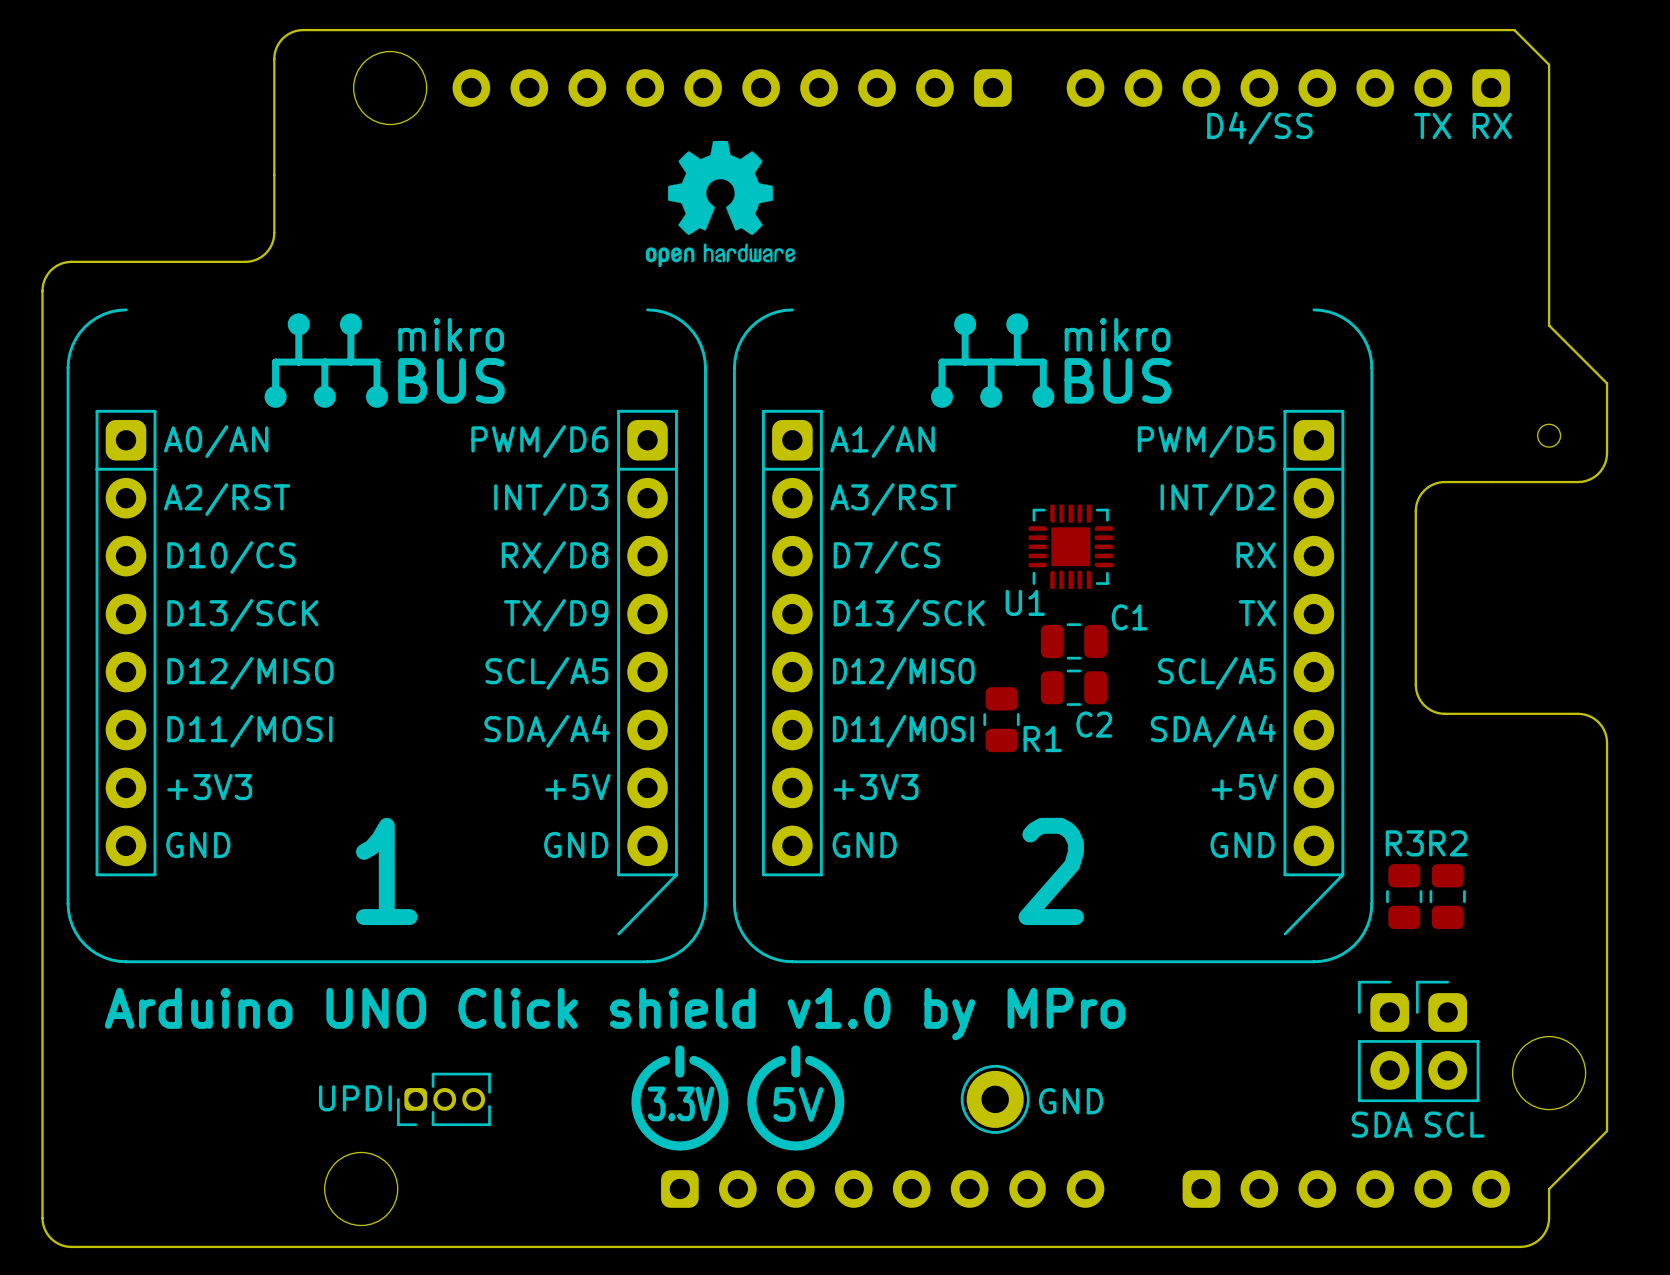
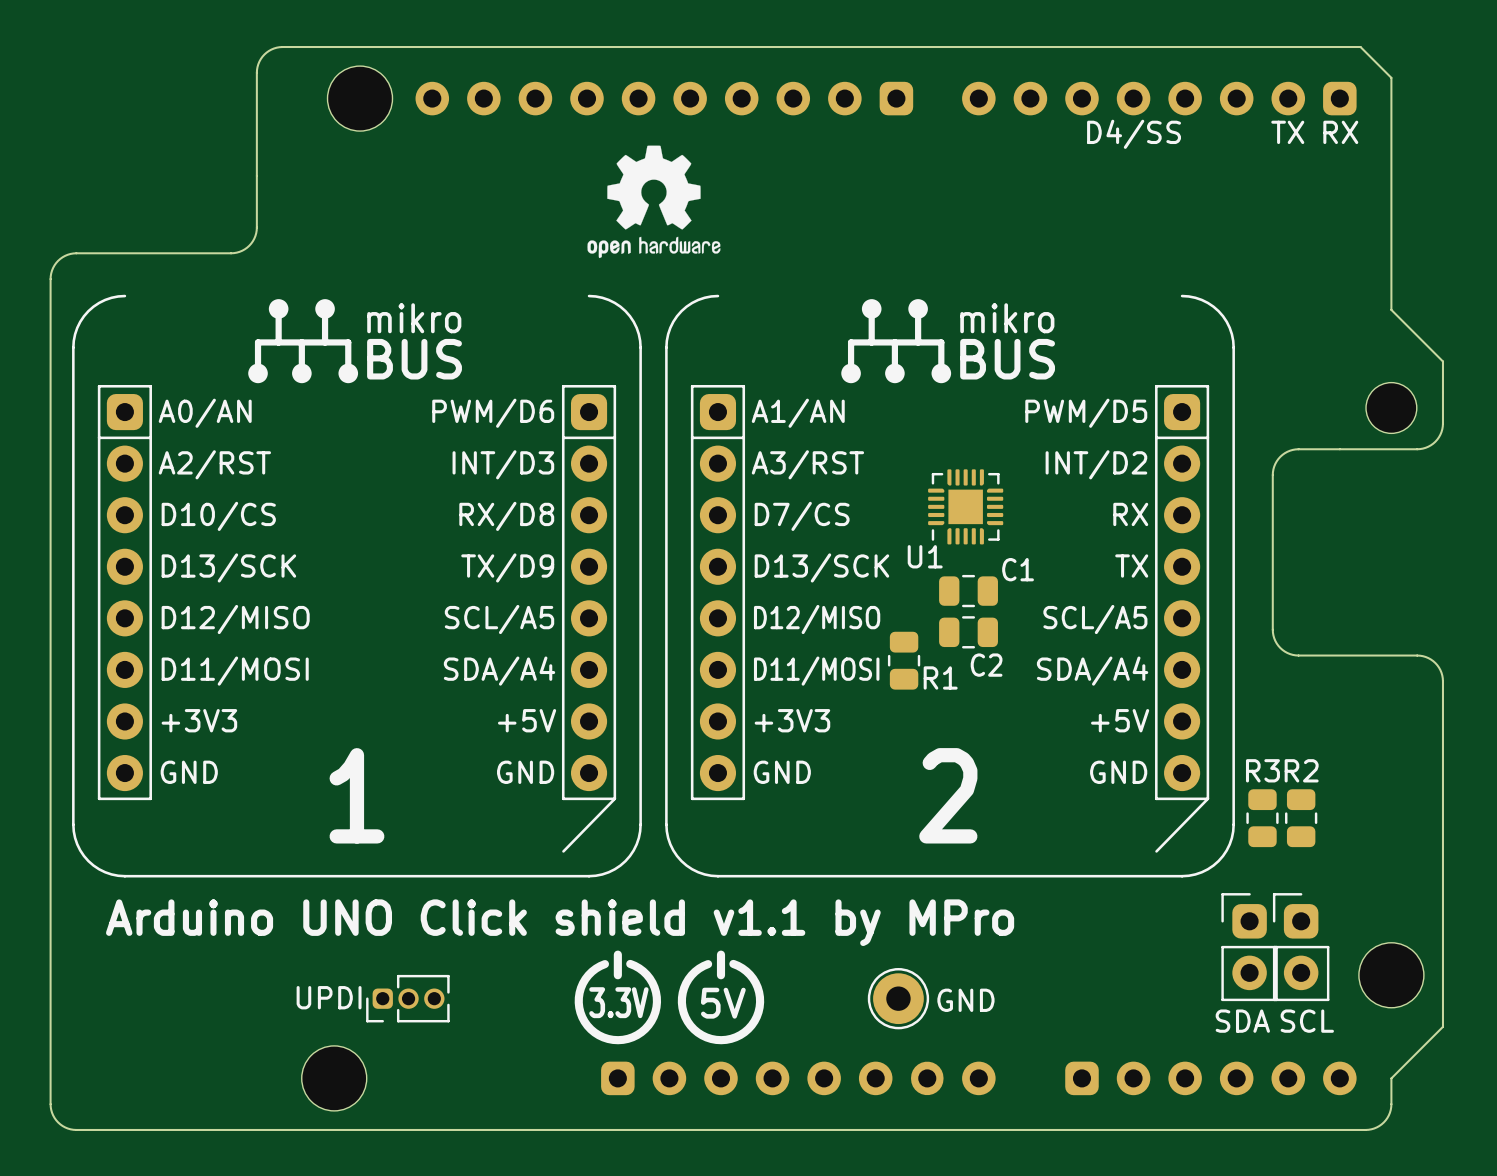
part footprint: [41, 28, 1609, 1249] -> [49, 45, 1444, 1131]
text: Arduino UNO Click shield v1.0 by MPro (614, 1014) -> Arduino UNO Click shield v1.1 by MPro (560, 922)

